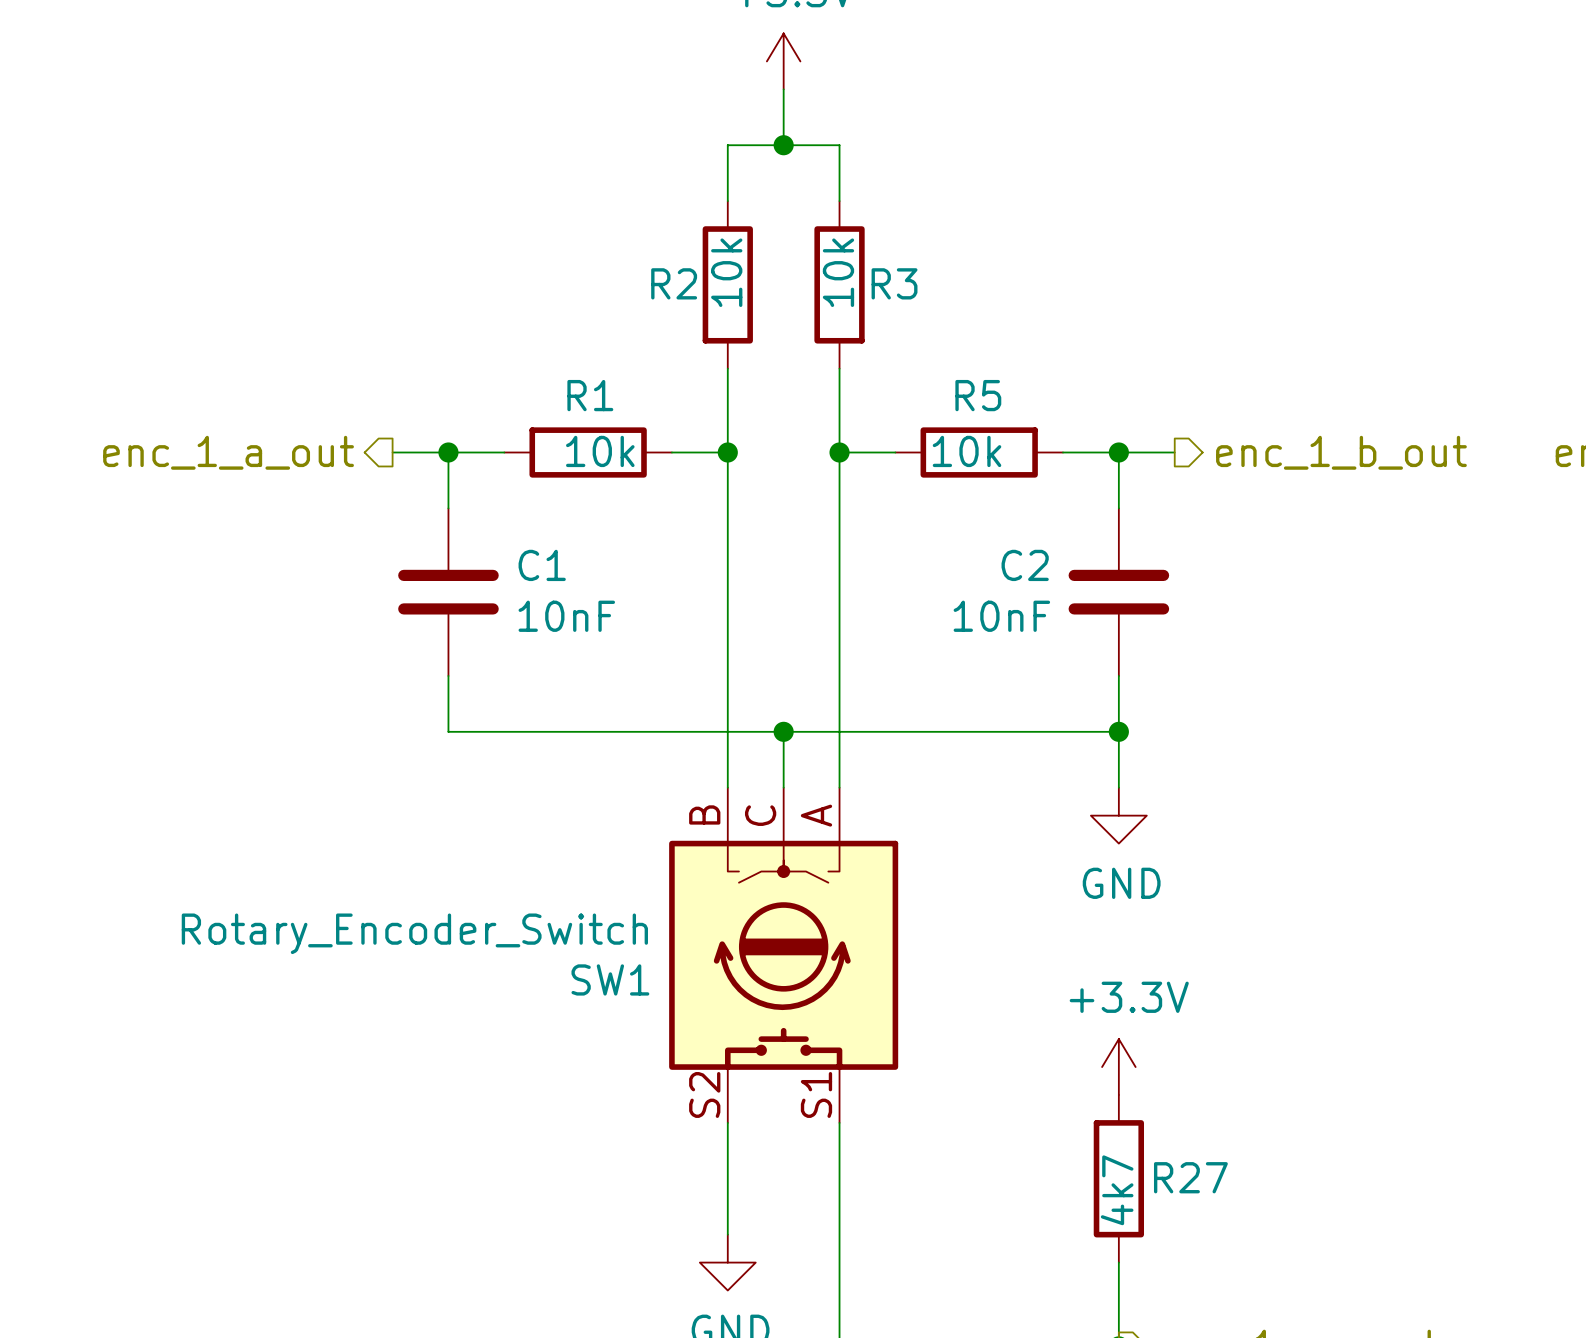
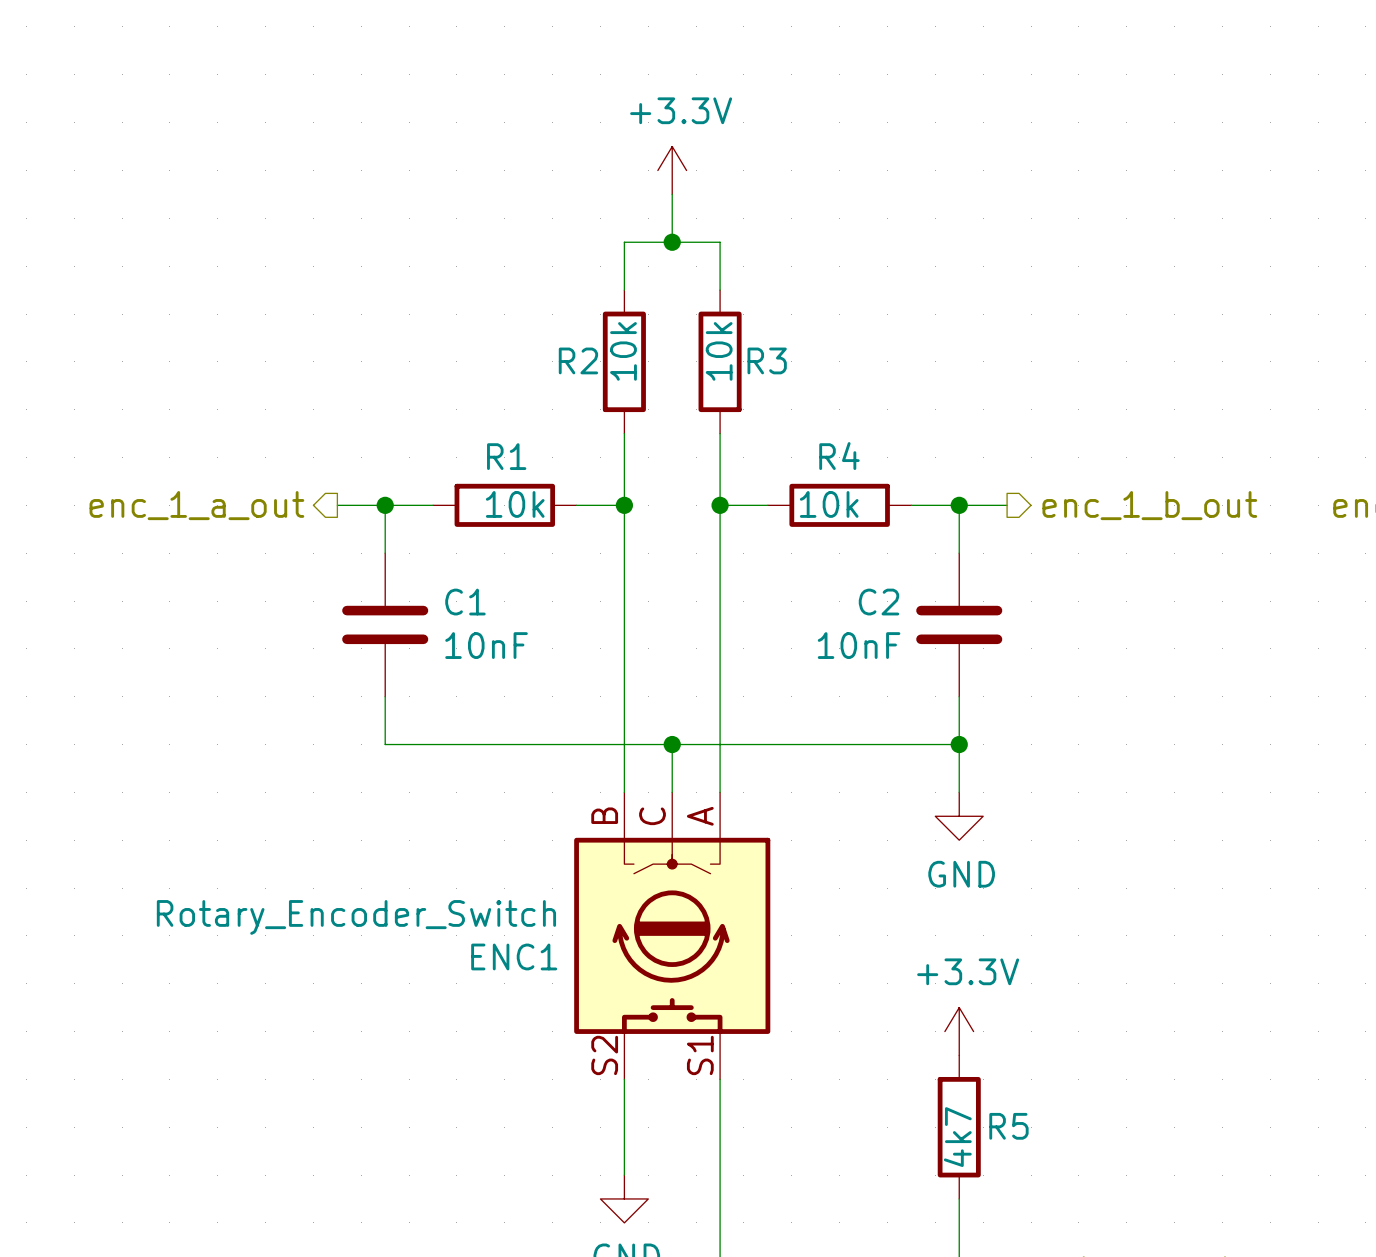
R5 name: R5 (978, 395) -> R4 (839, 456)
SW1 name: SW1 (610, 979) -> ENC1 (514, 956)
R27 name: R27 (1190, 1177) -> R5 (1008, 1126)

